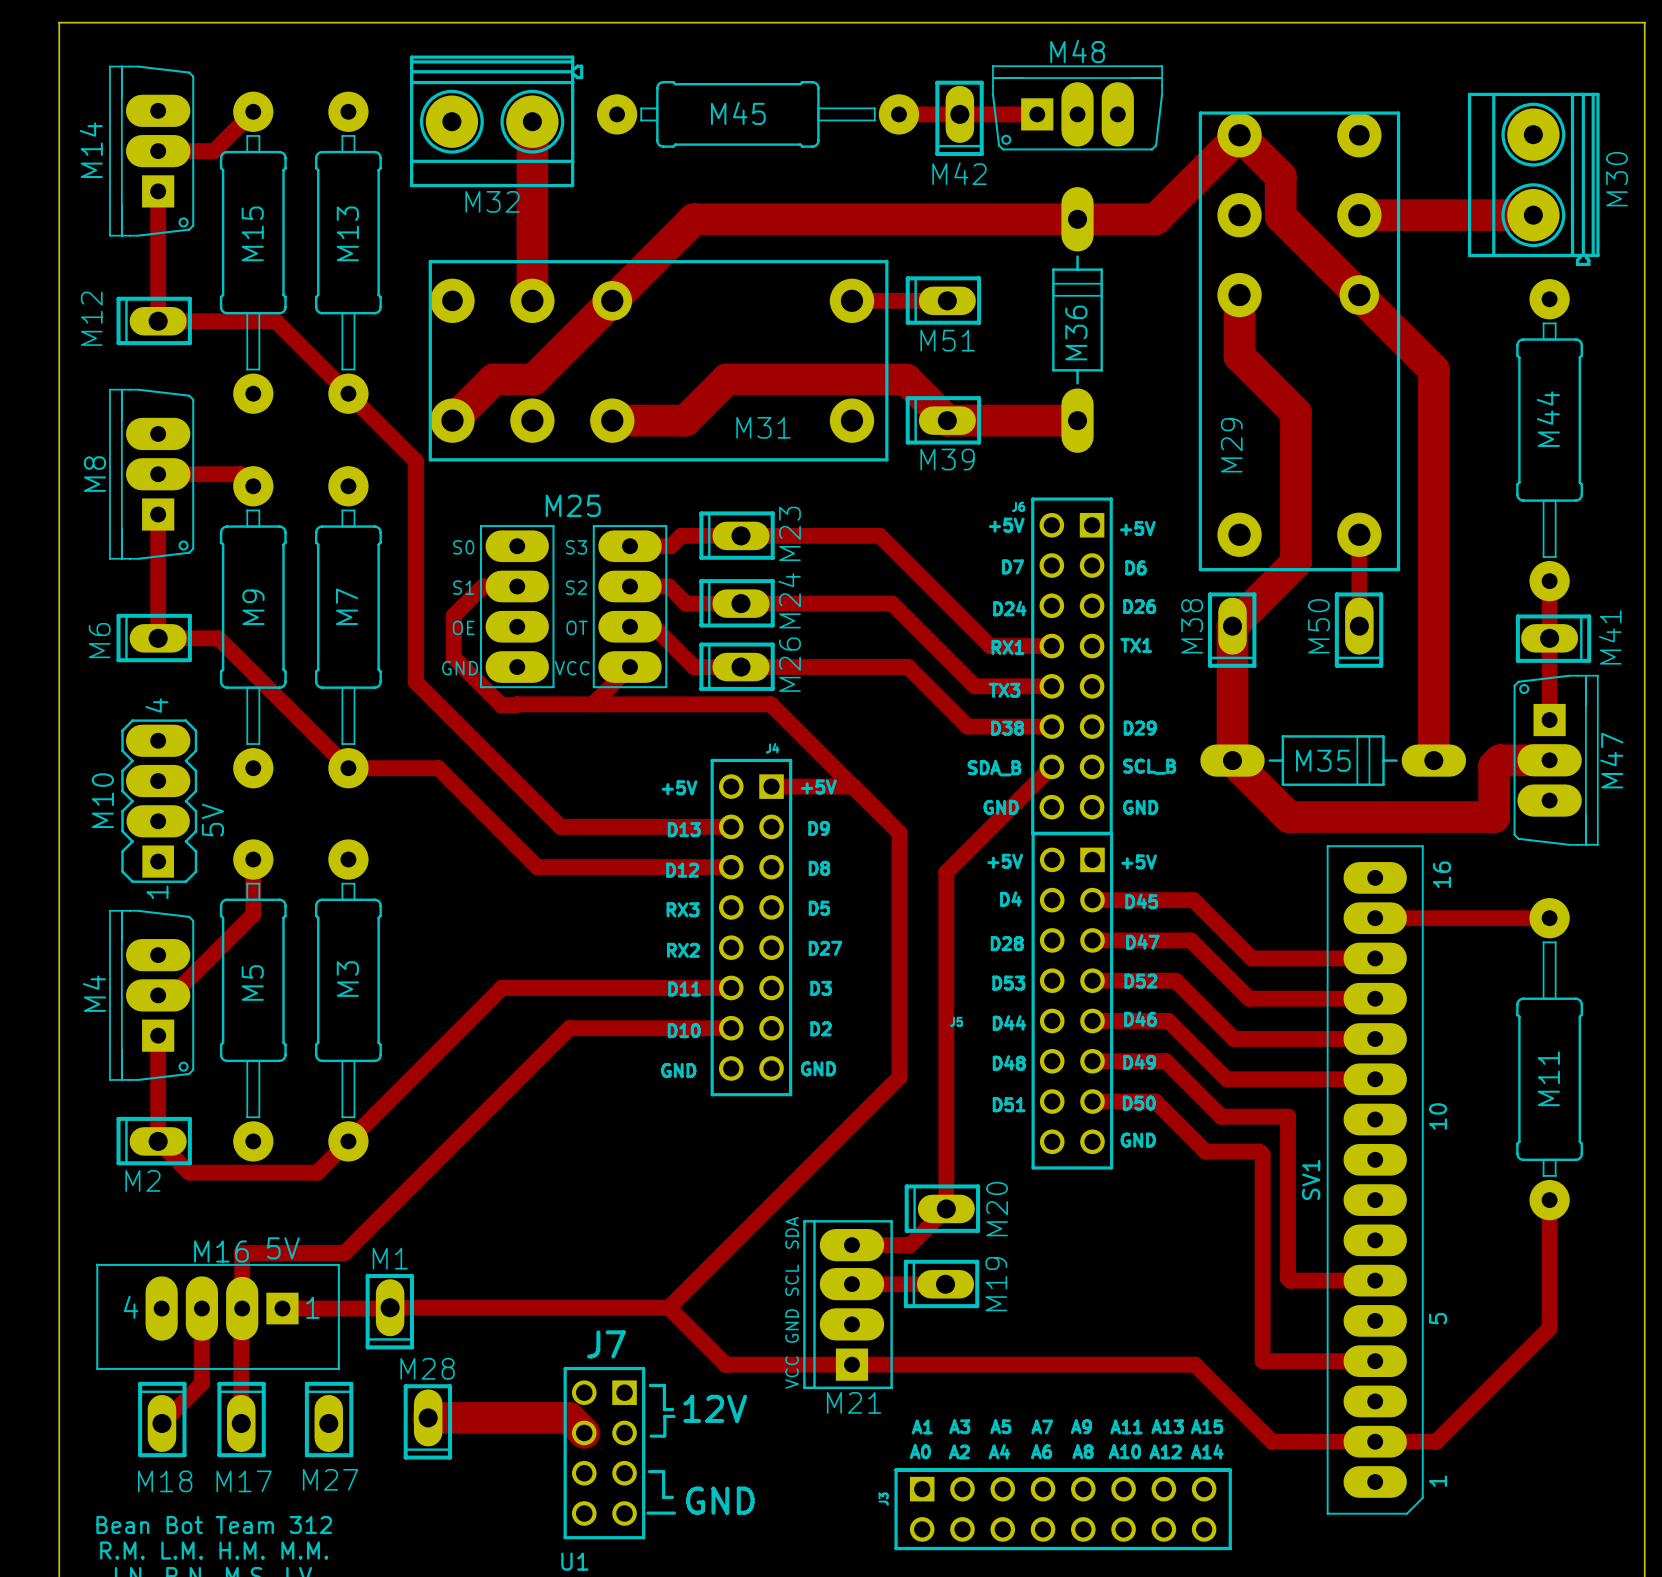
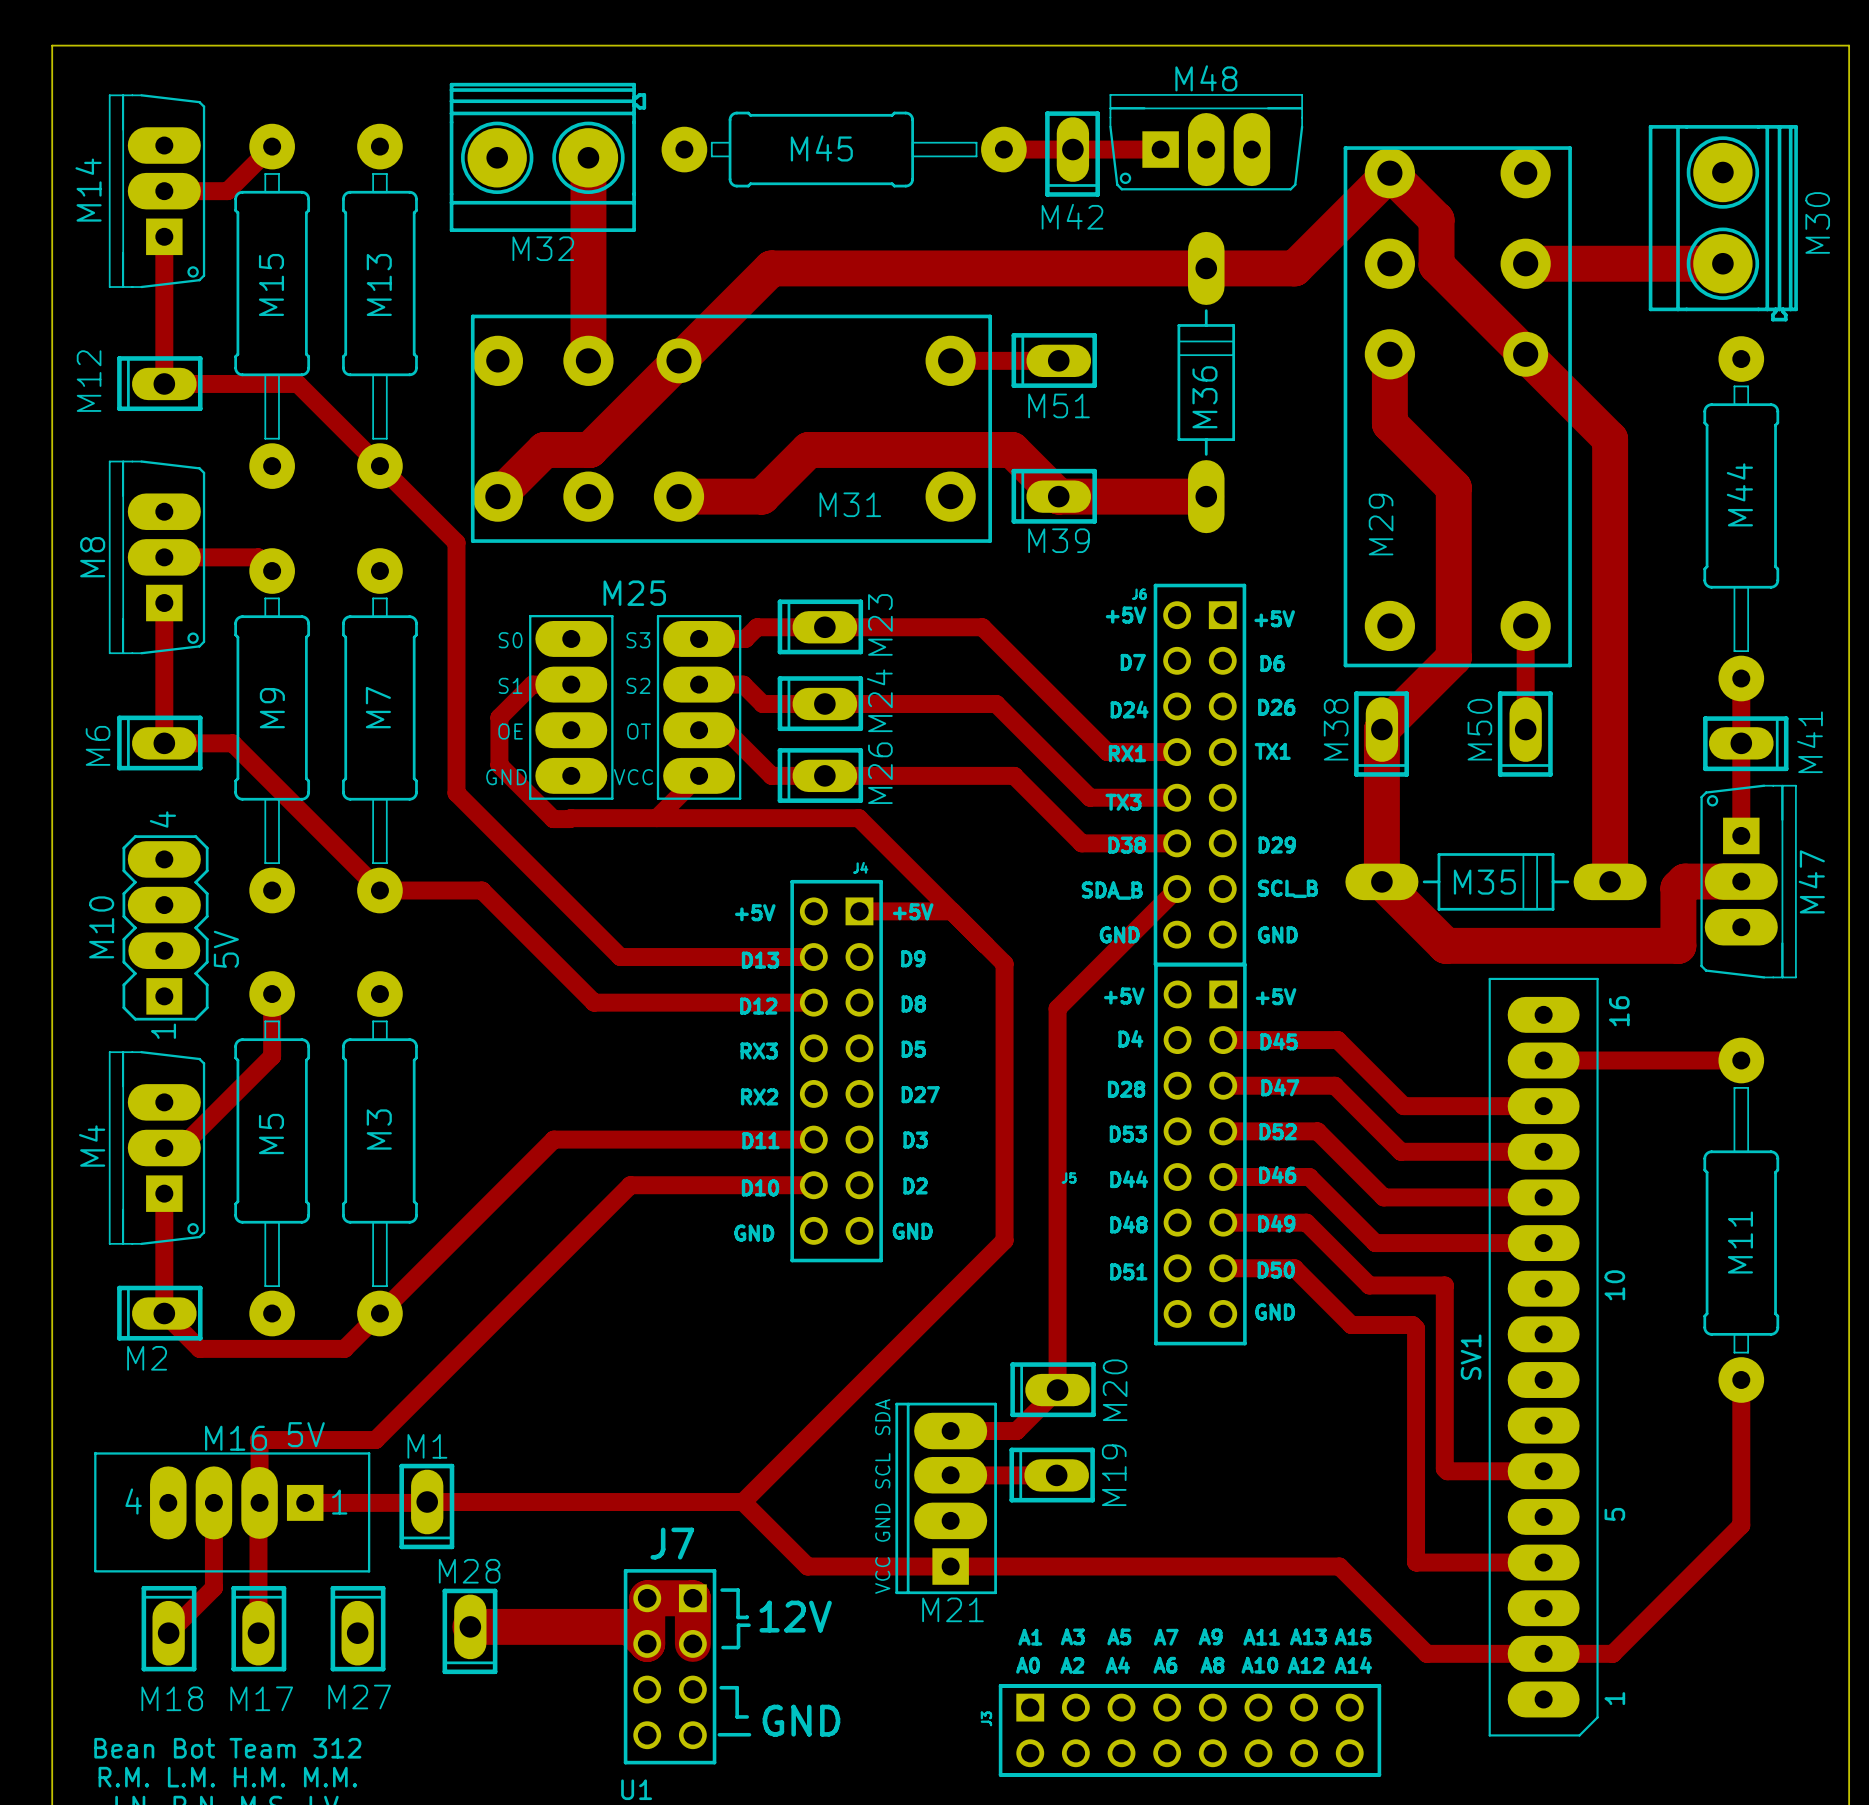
track: none -> (647, 1643) (647, 1598) (692, 1598) (692, 1643)

